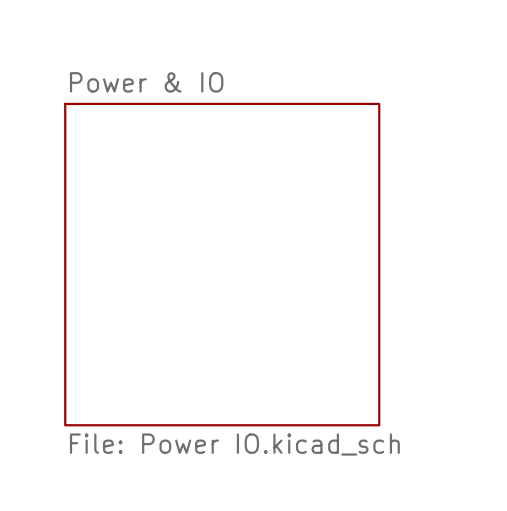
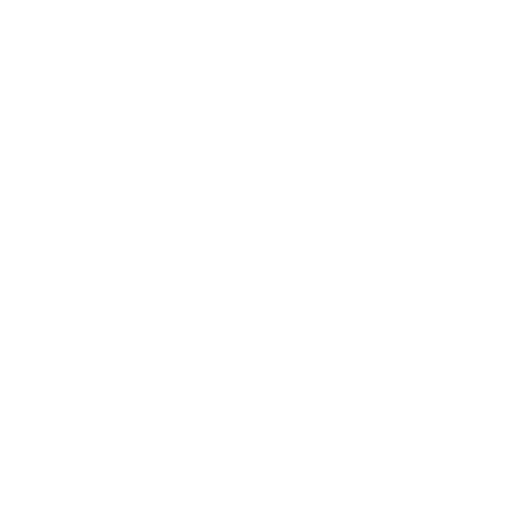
sheet Power & IO: File: Power IO.kicad_sch (222, 264) -> none

